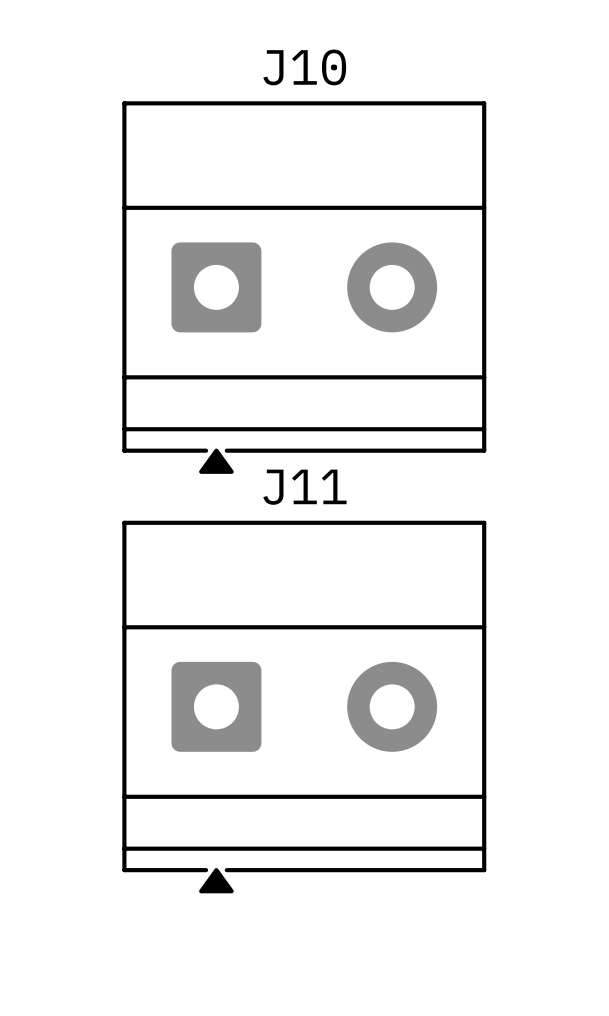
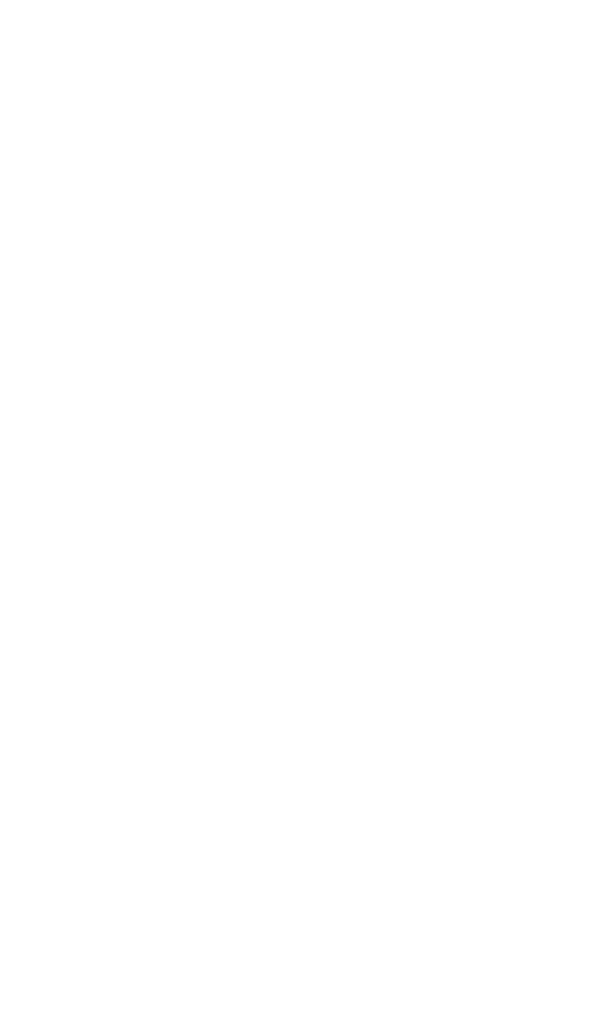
J10: (304, 287) -> none
J11: (304, 707) -> none

